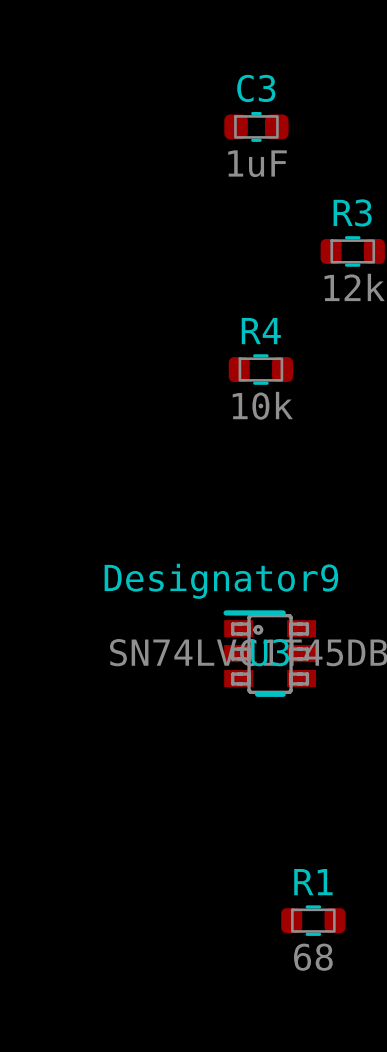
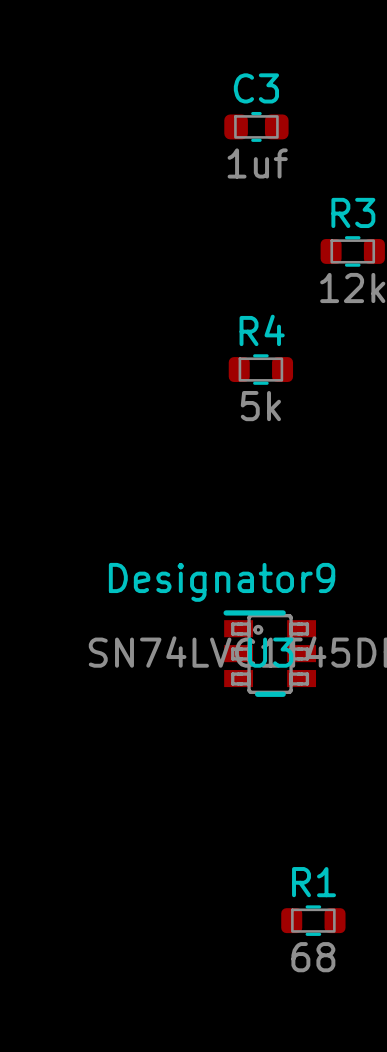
C3 value: 1uF (257, 163) -> 1uf (257, 163)
R4 value: 10k (262, 405) -> 5k (260, 406)

